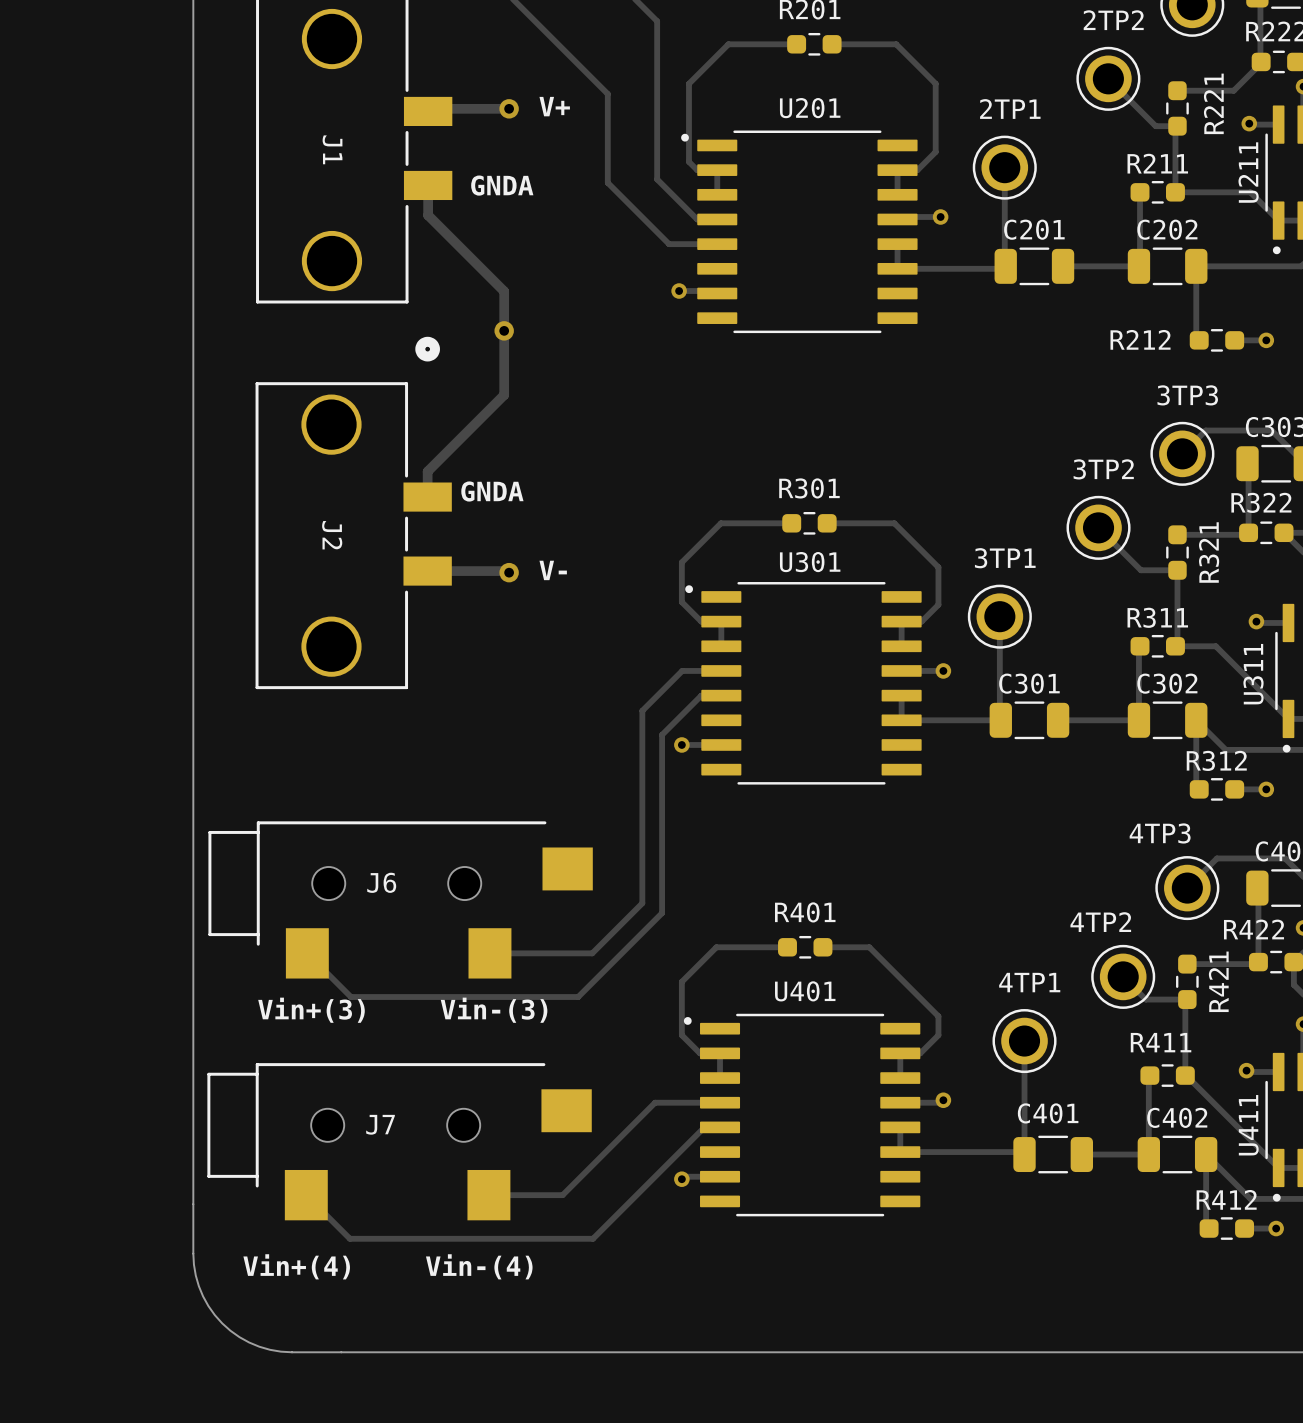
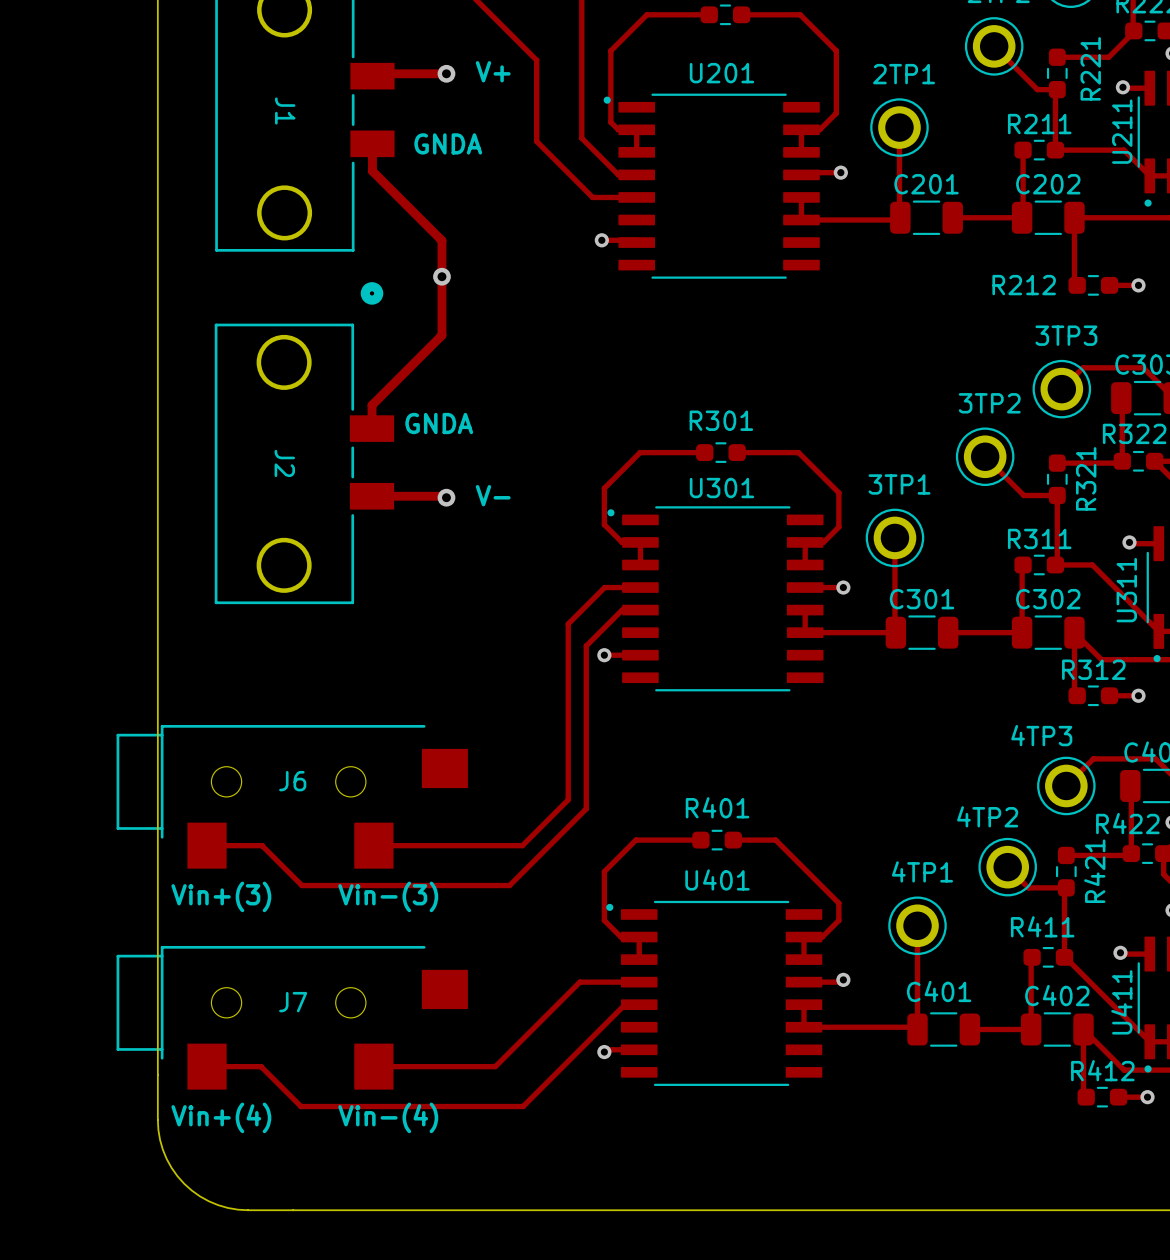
J6 name position: J6 (381, 882) -> J6 (292, 781)
J6 position: (400, 899) -> (292, 796)
track: none -> (207, 845) (262, 845)
track: none -> (373, 845) (428, 845)
text position: Vin+(3) (311, 1010) -> Vin+(3) (221, 896)
text position: Vin-(3) (494, 1010) -> Vin-(3) (388, 896)
J7 name position: J7 (380, 1124) -> J7 (293, 1002)
J7 position: (399, 1141) -> (292, 1017)
track: none -> (207, 1066) (261, 1066)
track: none -> (373, 1066) (428, 1066)
text position: Vin+(4) (296, 1266) -> Vin+(4) (221, 1117)
text position: Vin-(4) (479, 1266) -> Vin-(4) (388, 1117)

